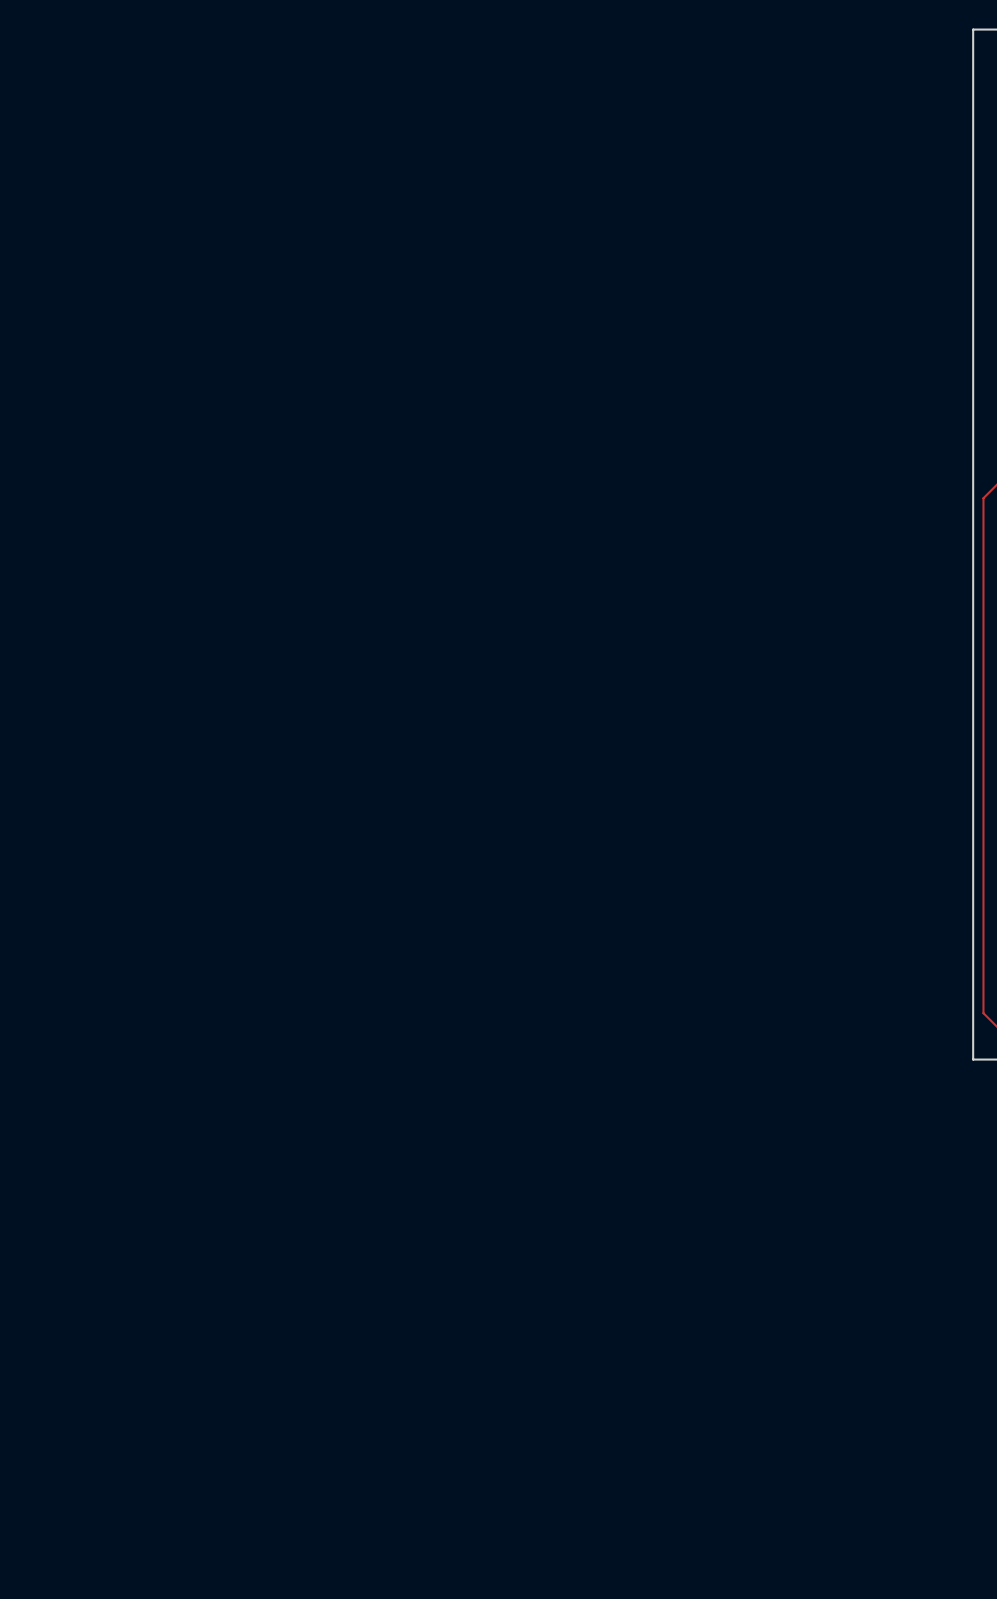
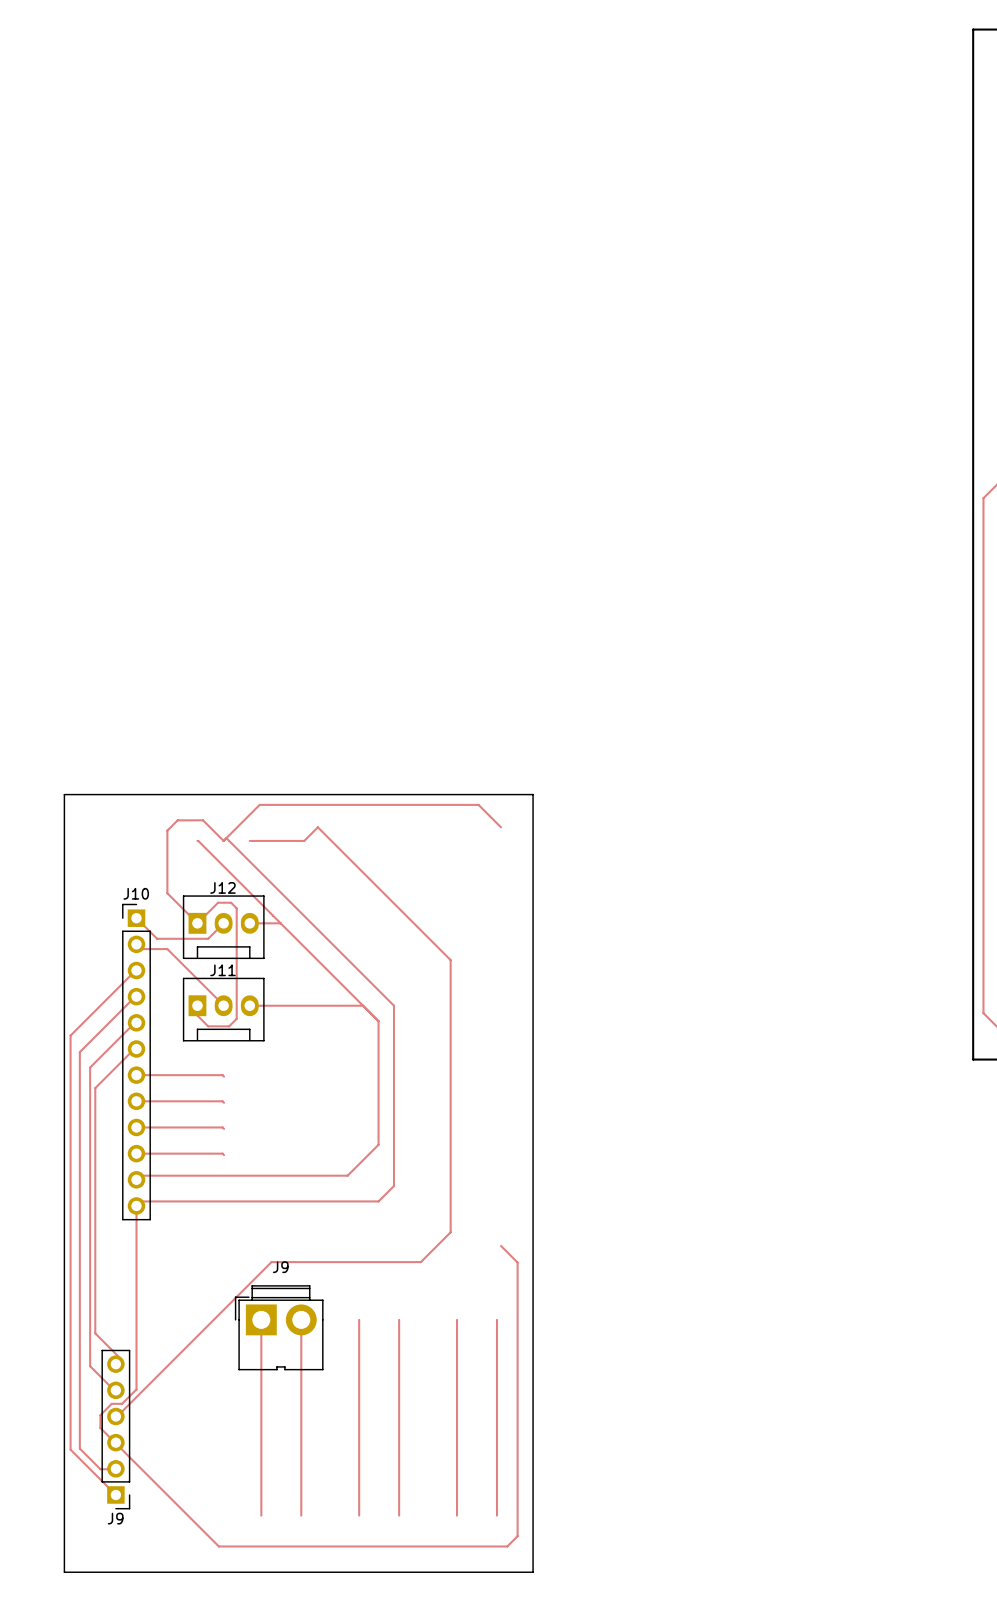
board edge: none -> (64, 794) (533, 794) (533, 1572) (64, 1572) (64, 794)
top track: none -> (501, 827) (478, 804) (259, 804) (223, 840) (203, 820) (177, 820) (167, 830) (167, 893) (197, 923) (218, 902) (231, 902) (236, 908) (236, 1018) (229, 1026) (208, 1026) (197, 1015) (197, 1005)
top track: none -> (226, 838) (393, 1005) (393, 1185) (378, 1201) (136, 1201) (136, 1389) (122, 1403) (111, 1403) (100, 1415) (100, 1428) (218, 1546) (507, 1546) (517, 1536) (517, 1262) (501, 1245)
top track: none -> (197, 840) (378, 1021) (378, 1144) (347, 1175) (136, 1175)
top track: none -> (249, 840) (304, 840) (317, 827) (450, 960) (450, 1232) (420, 1262) (271, 1262) (115, 1417)
top track: none -> (136, 918) (157, 938) (208, 938) (223, 923)
top track: none -> (249, 923) (280, 923)
J12: none -> (223, 927)
top track: none -> (136, 944) (141, 949) (167, 949) (223, 1005)
top track: none -> (136, 969) (70, 1035) (70, 1449) (115, 1494)
top track: none -> (136, 995) (79, 1052) (79, 1448) (100, 1469) (115, 1469)
top track: none -> (249, 1005) (363, 1005)
J11: none -> (223, 1009)
top track: none -> (136, 1021) (90, 1067) (90, 1366) (115, 1391)
top track: none -> (136, 1046) (95, 1088) (95, 1333) (122, 1360) (115, 1366)
J10: none -> (136, 1062)
top track: none -> (136, 1075) (224, 1076)
top track: none -> (136, 1101) (224, 1102)
top track: none -> (136, 1127) (224, 1128)
top track: none -> (136, 1153) (224, 1155)
top track: none -> (261, 1316) (261, 1515)
top track: none -> (301, 1316) (301, 1515)
top track: none -> (359, 1319) (359, 1515)
top track: none -> (399, 1319) (399, 1515)
top track: none -> (457, 1319) (457, 1515)
top track: none -> (496, 1319) (496, 1515)
J9: none -> (279, 1327)
J9: none -> (115, 1429)

